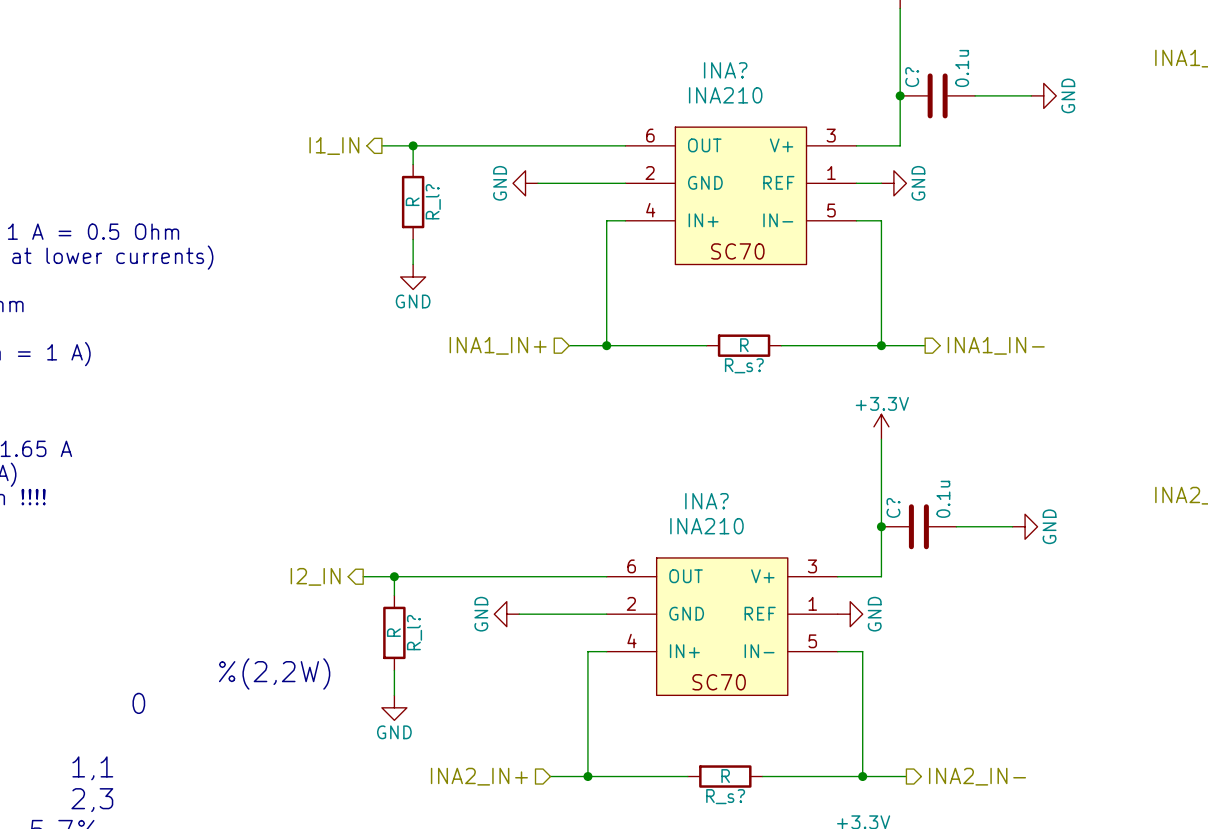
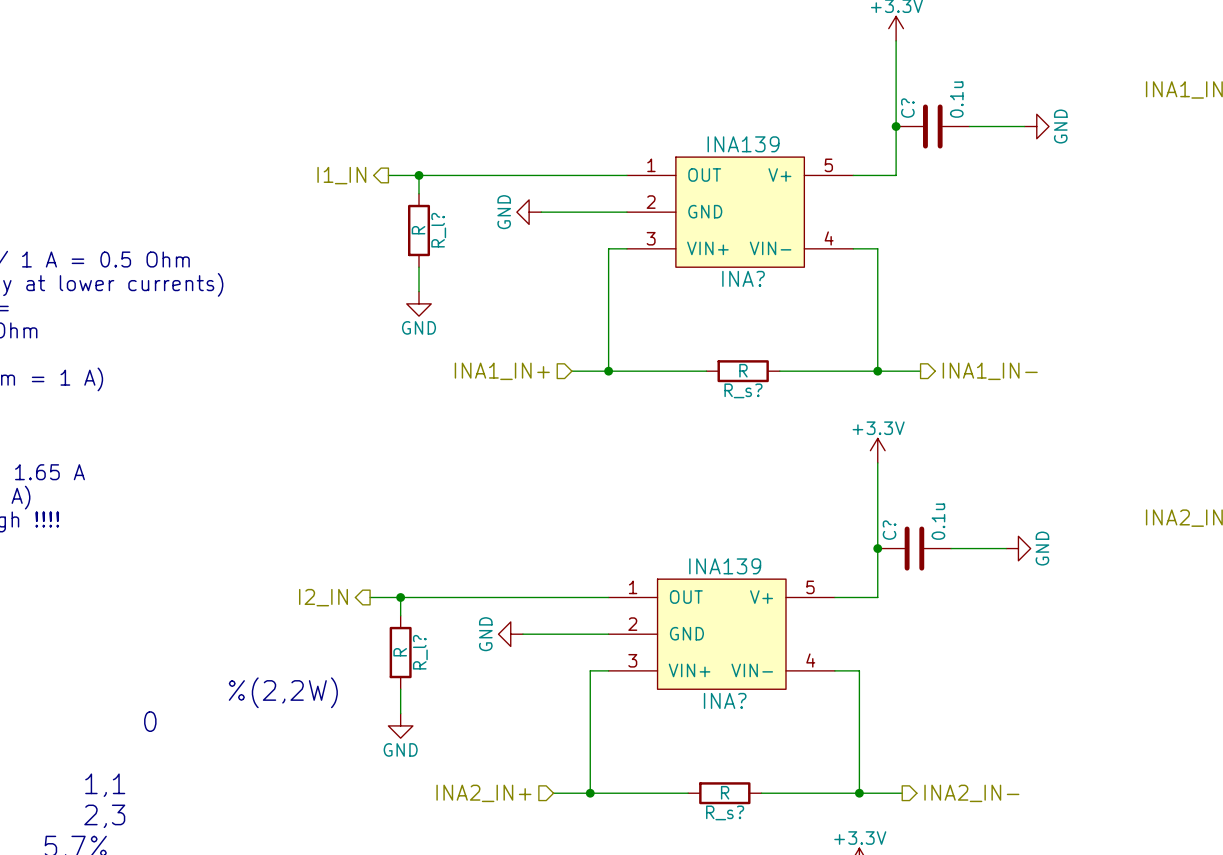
INA?: none -> INA139 (740, 212)
wire: (856, 183) (881, 183) -> none
power symbol: GND (893, 183) -> none
INA?: INA210 (740, 195) -> none
INA?: none -> INA139 (721, 634)
power symbol: GND (850, 614) -> none
INA?: INA210 (722, 626) -> none

